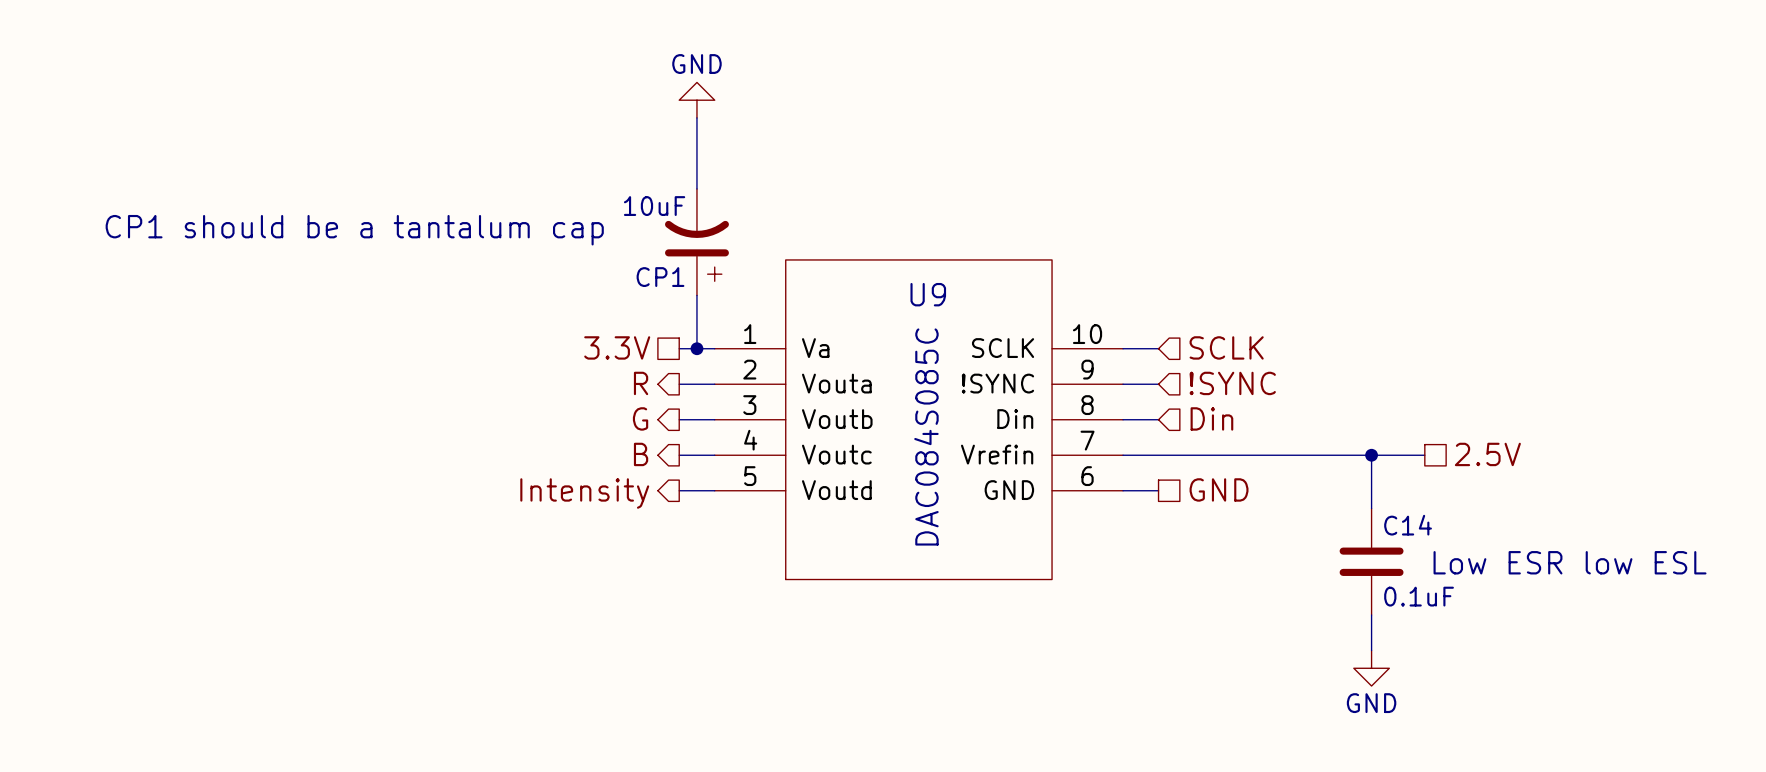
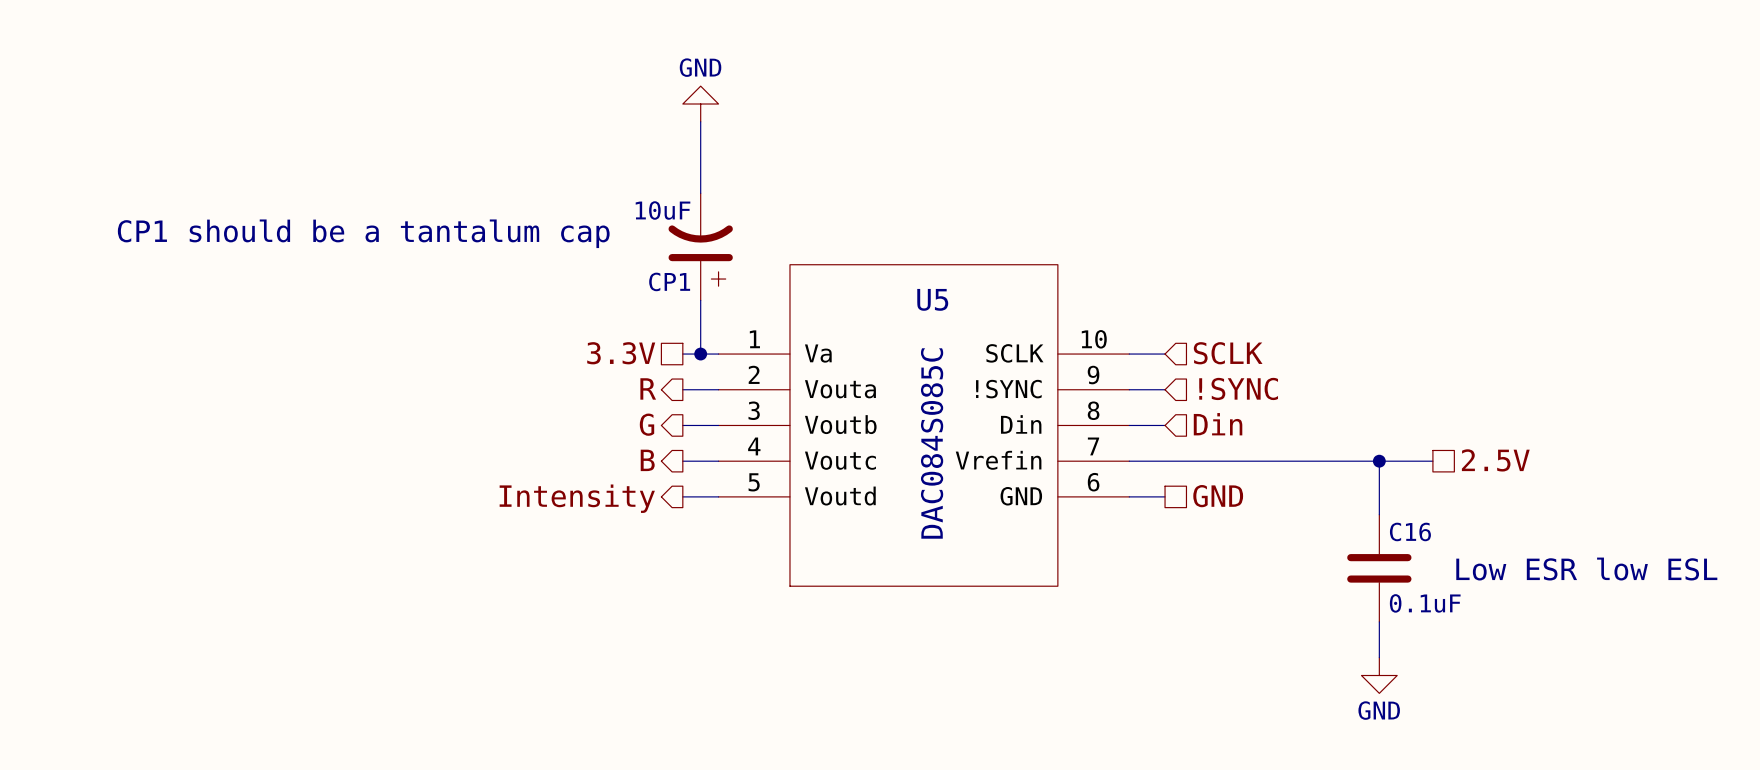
U9 name: U9 (928, 294) -> U5 (932, 299)
C14 name: C14 (1408, 525) -> C16 (1410, 531)

